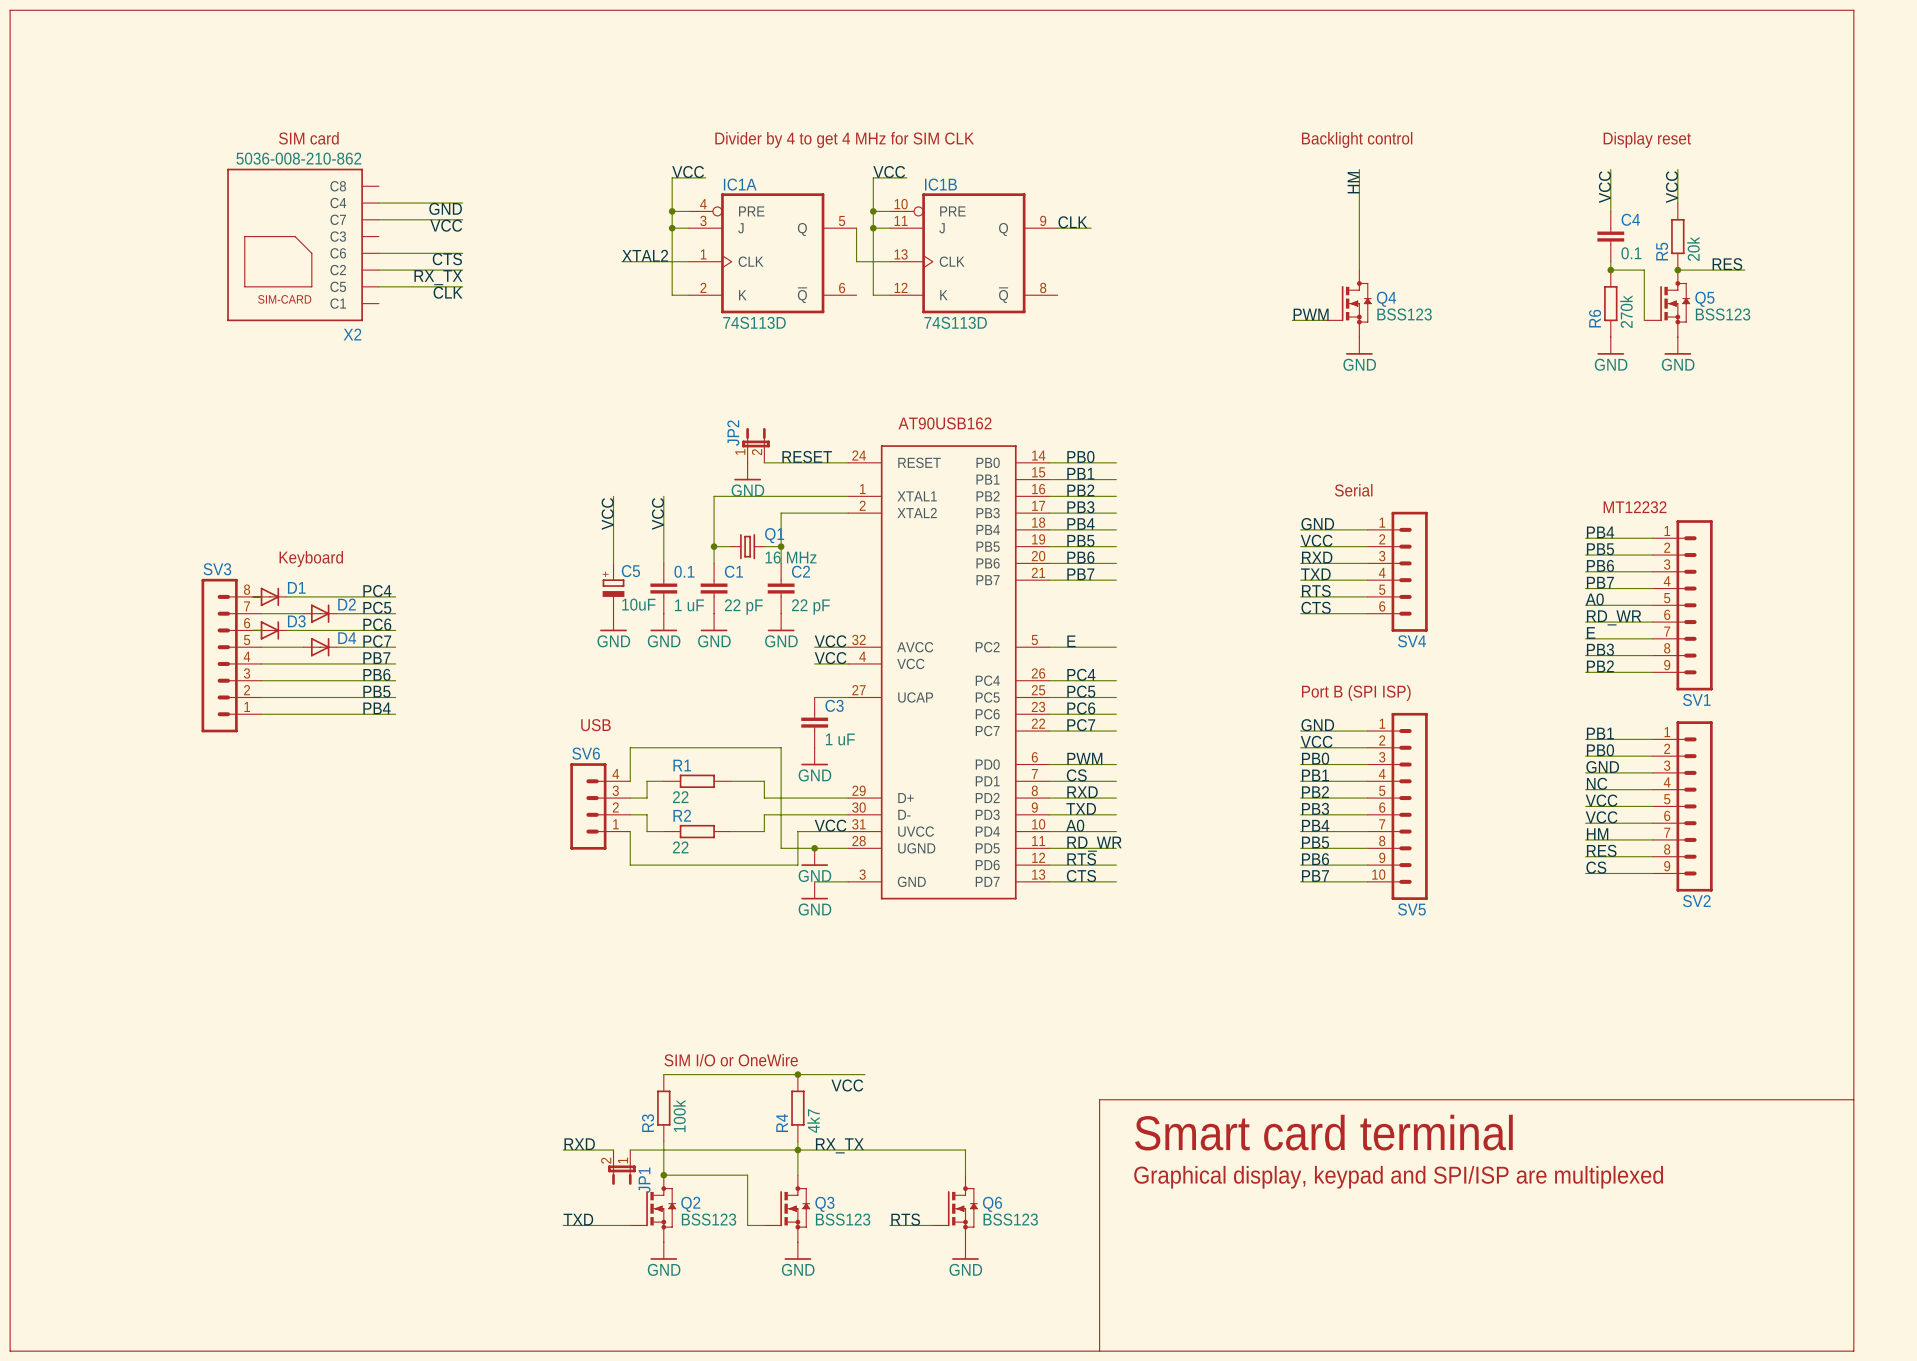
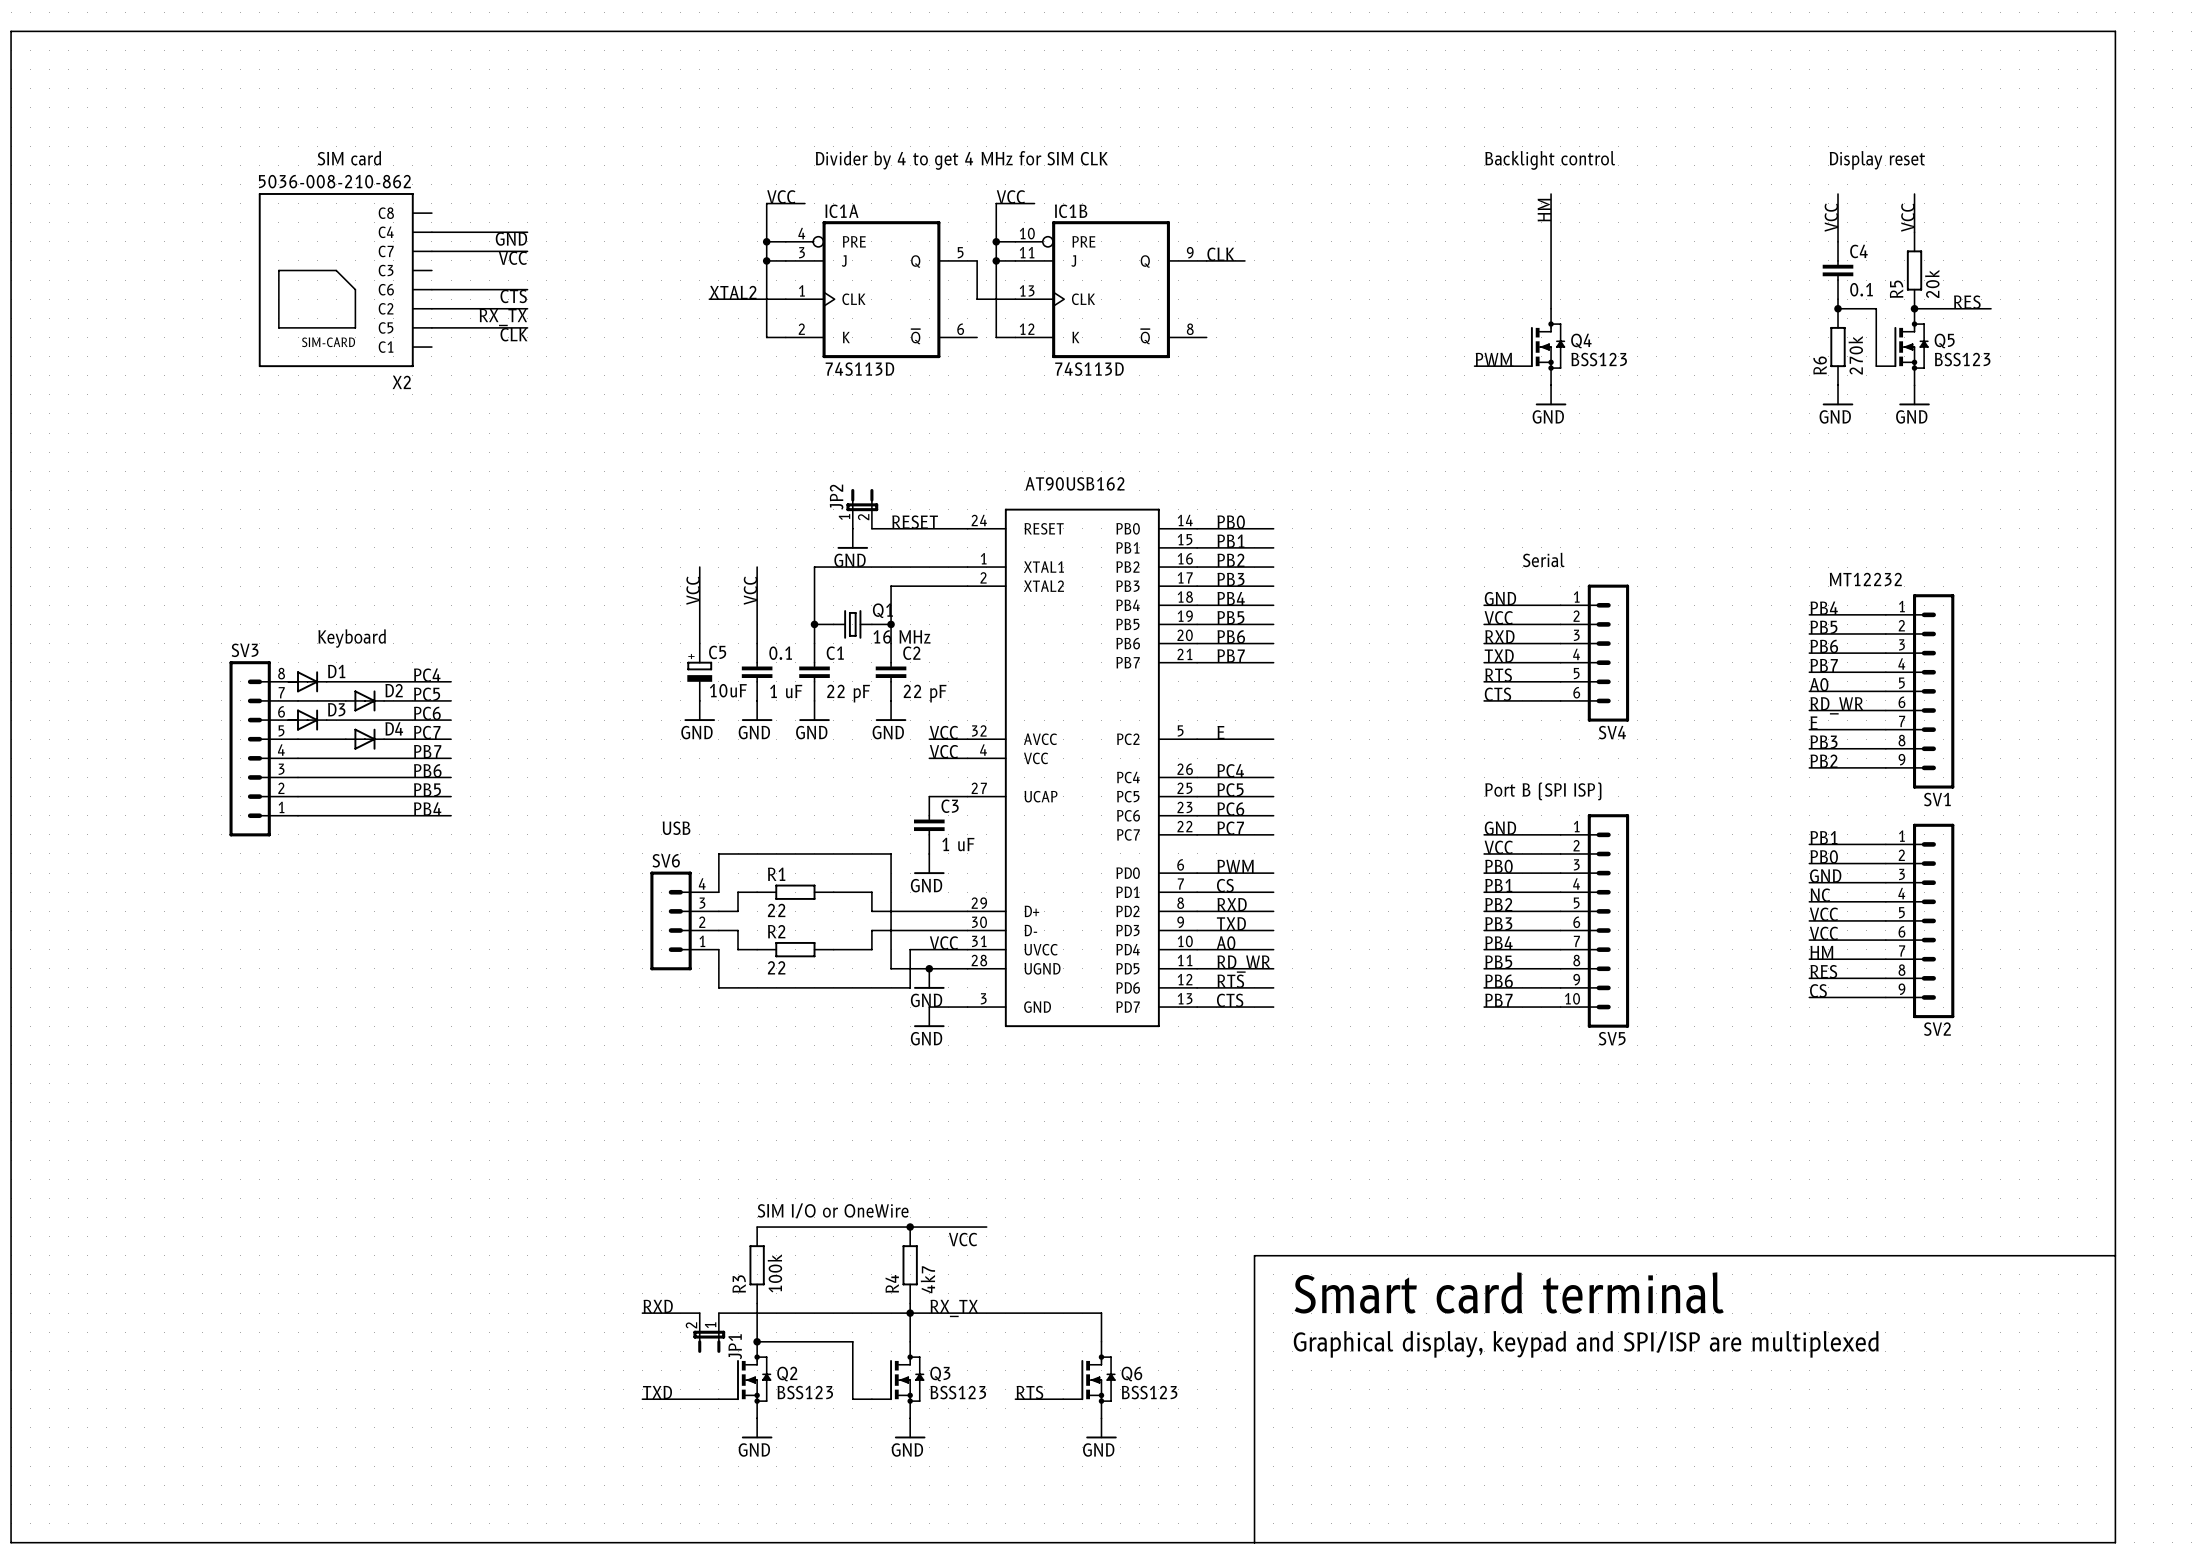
line: (10, 27) (10, 10) (1853, 10) (1853, 27) -> (11, 31) (2115, 31)

